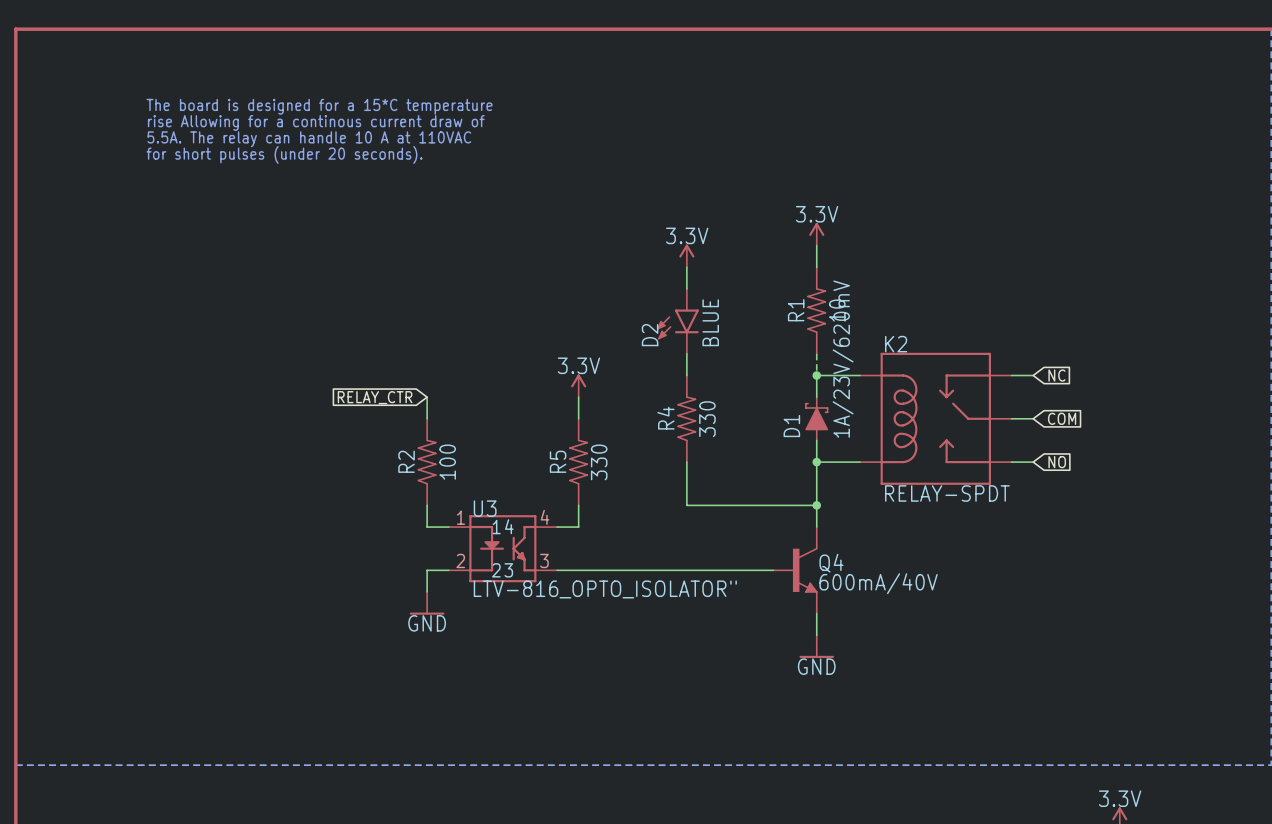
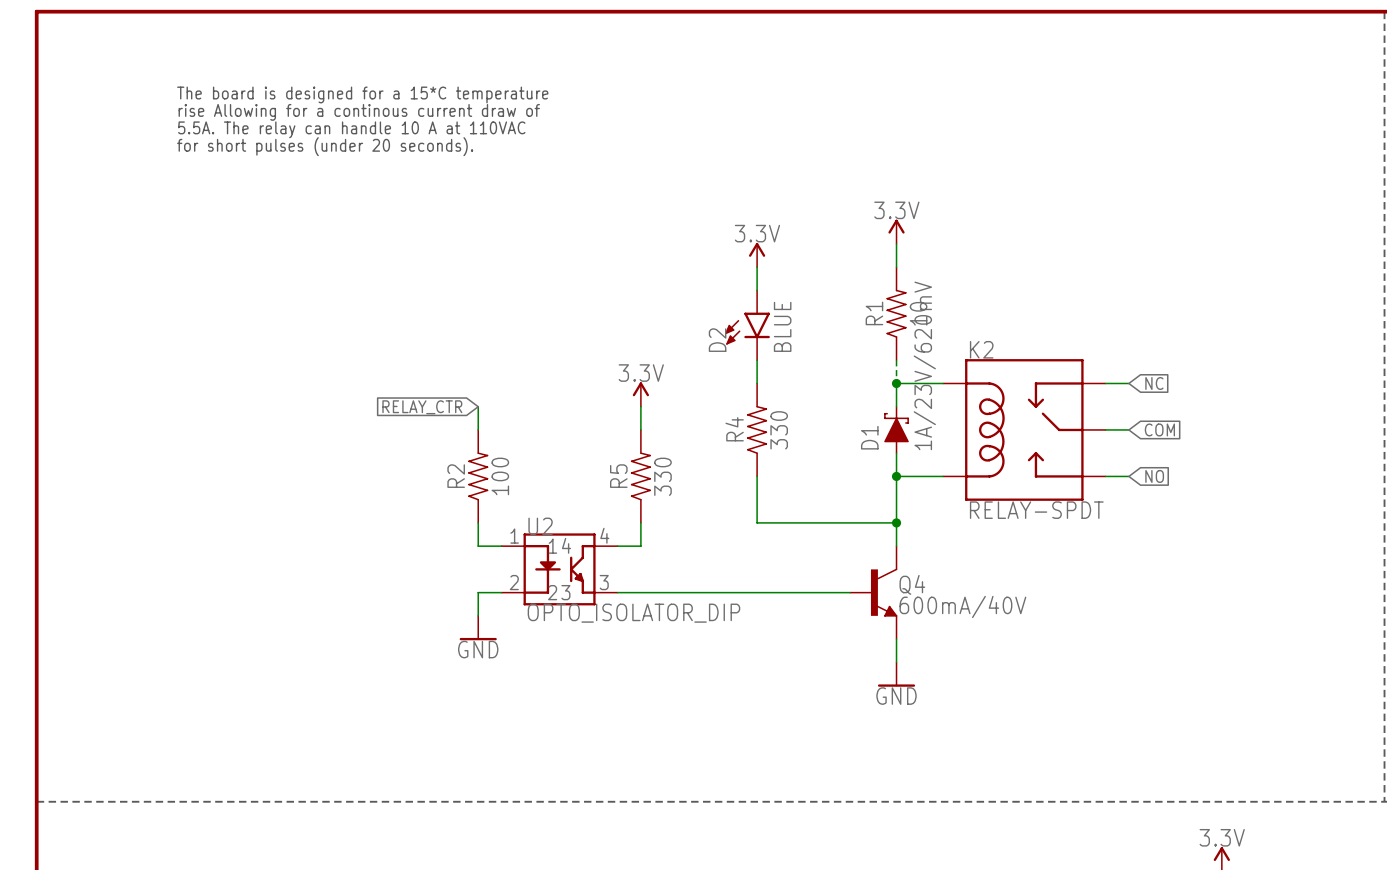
U3 name: U3 (485, 508) -> U2 (540, 526)
U3 value: LTV-816_OPTO_ISOLATOR" (605, 589) -> OPTO_ISOLATOR_DIP (633, 613)

